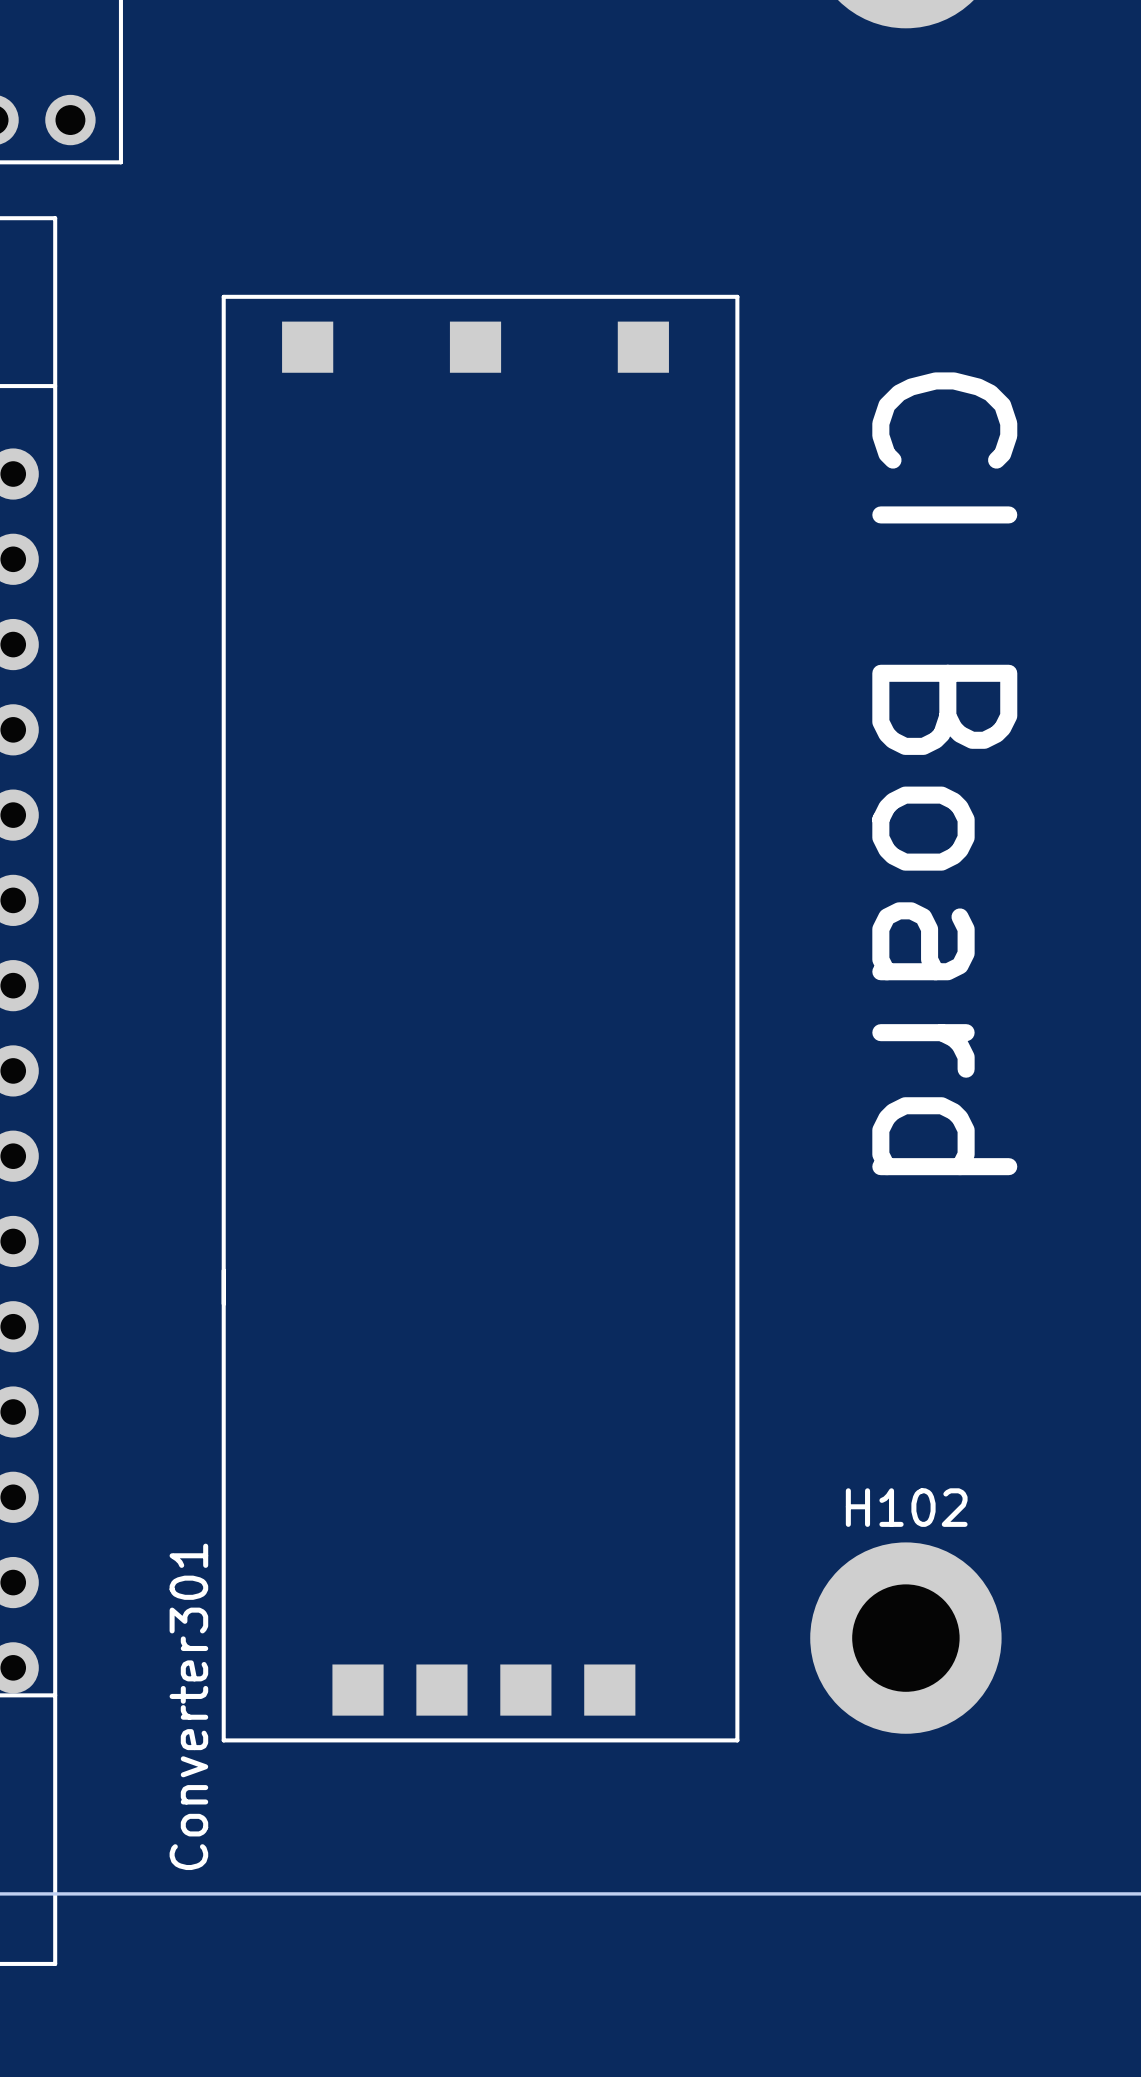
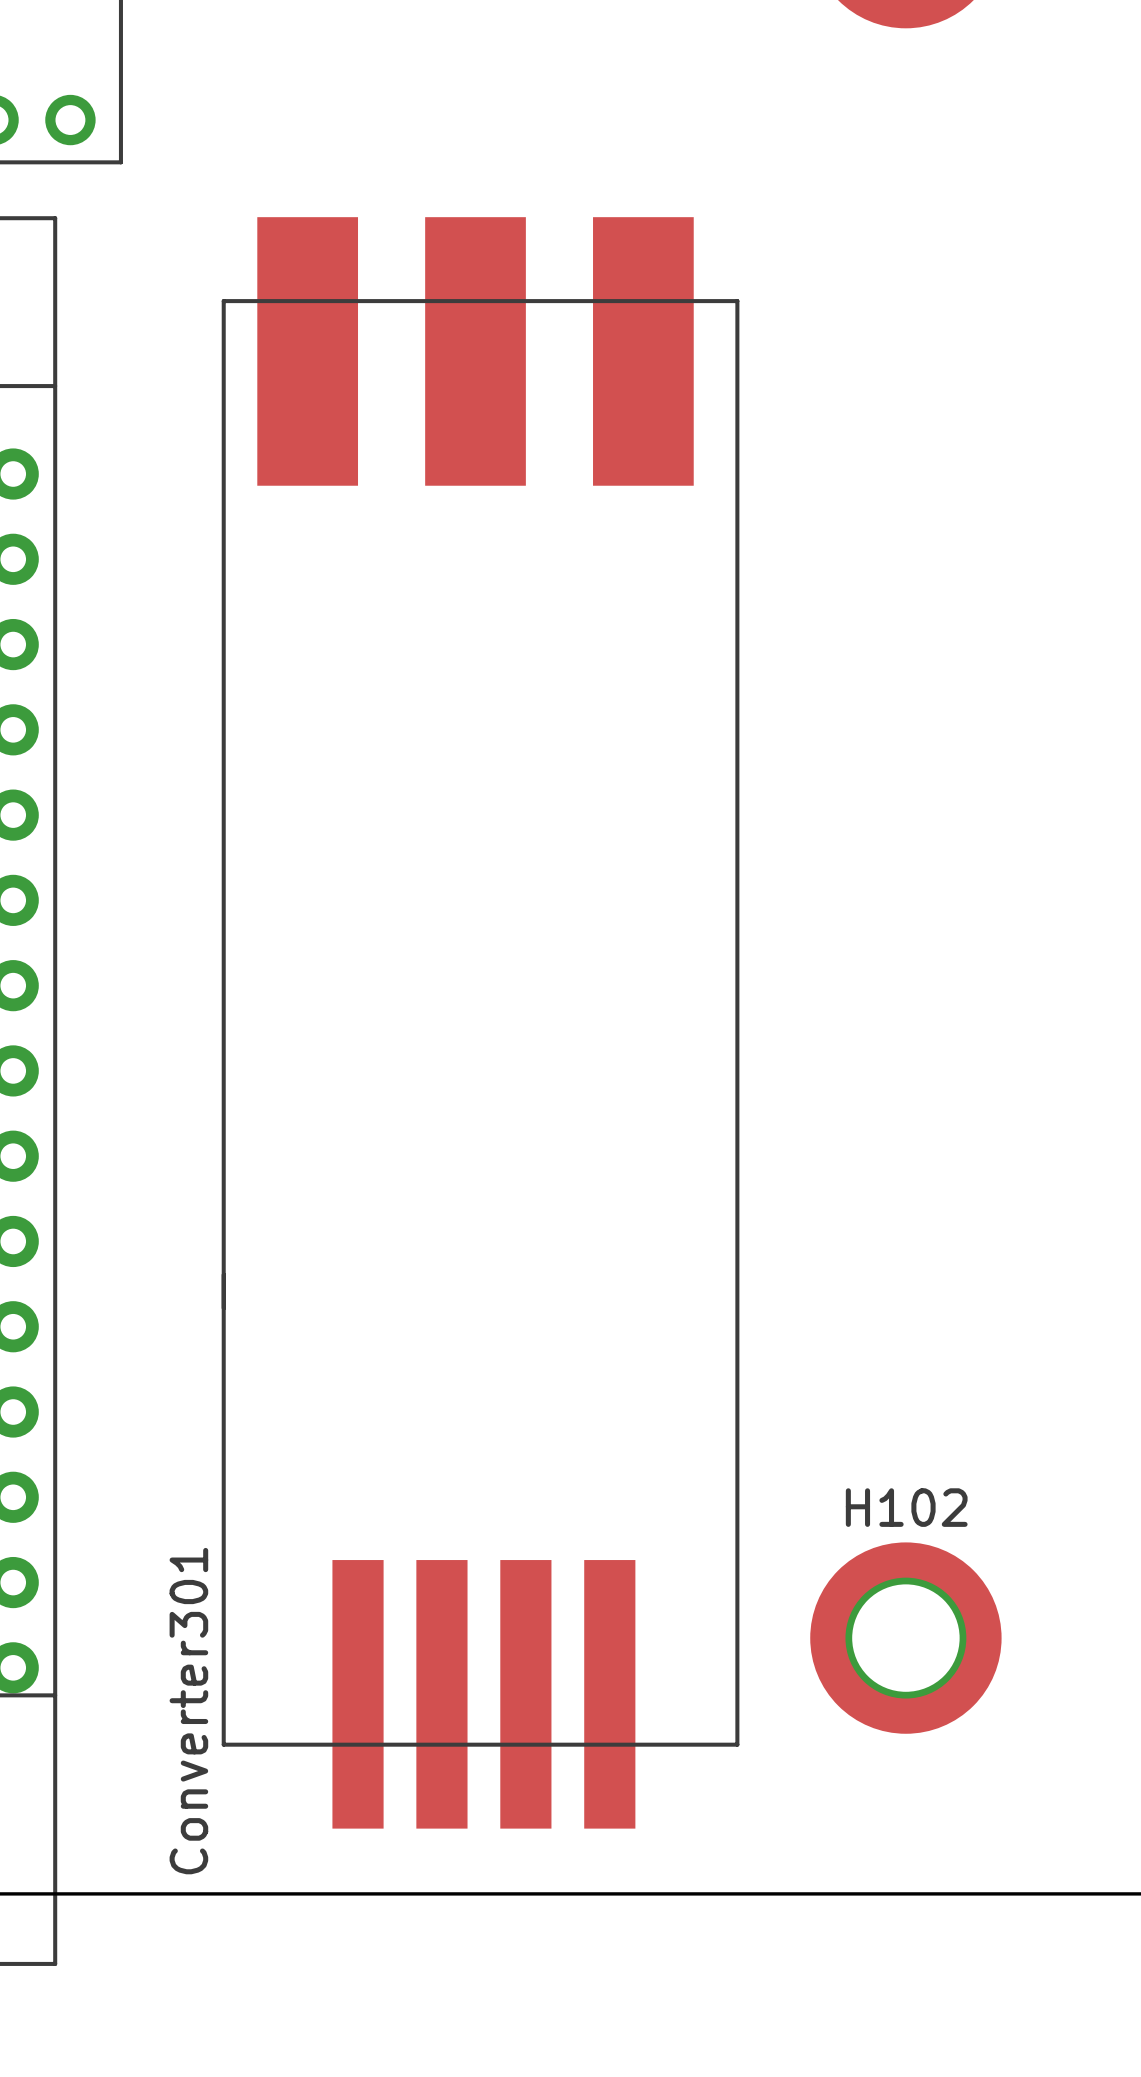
Converter301 footprint: [221, 294, 740, 1743] -> [221, 217, 740, 1829]
text: CI Board (944, 773) -> none

